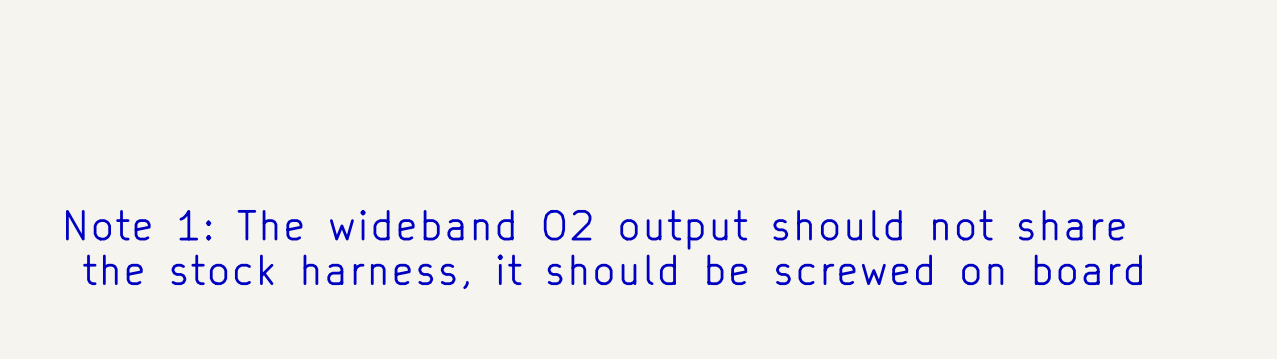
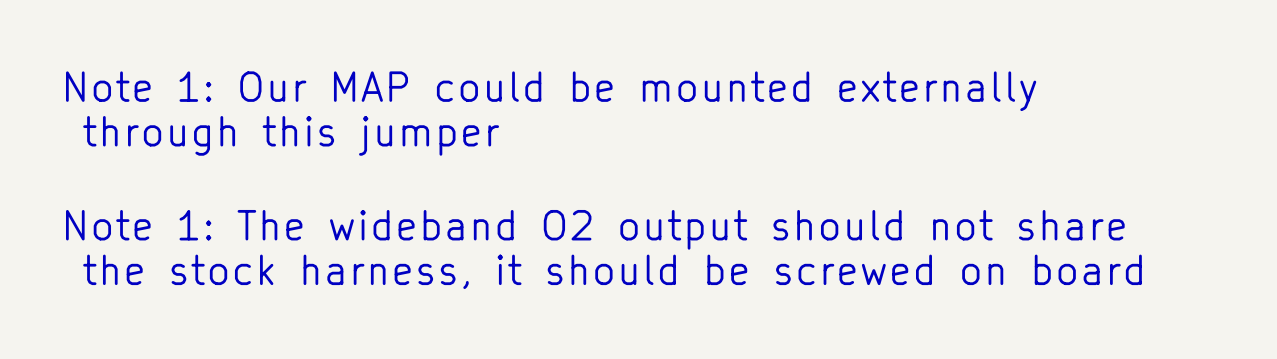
text: none -> Note 1: Our MAP could be mounted externally (551, 91)
text: none -> through this jumper (291, 135)

